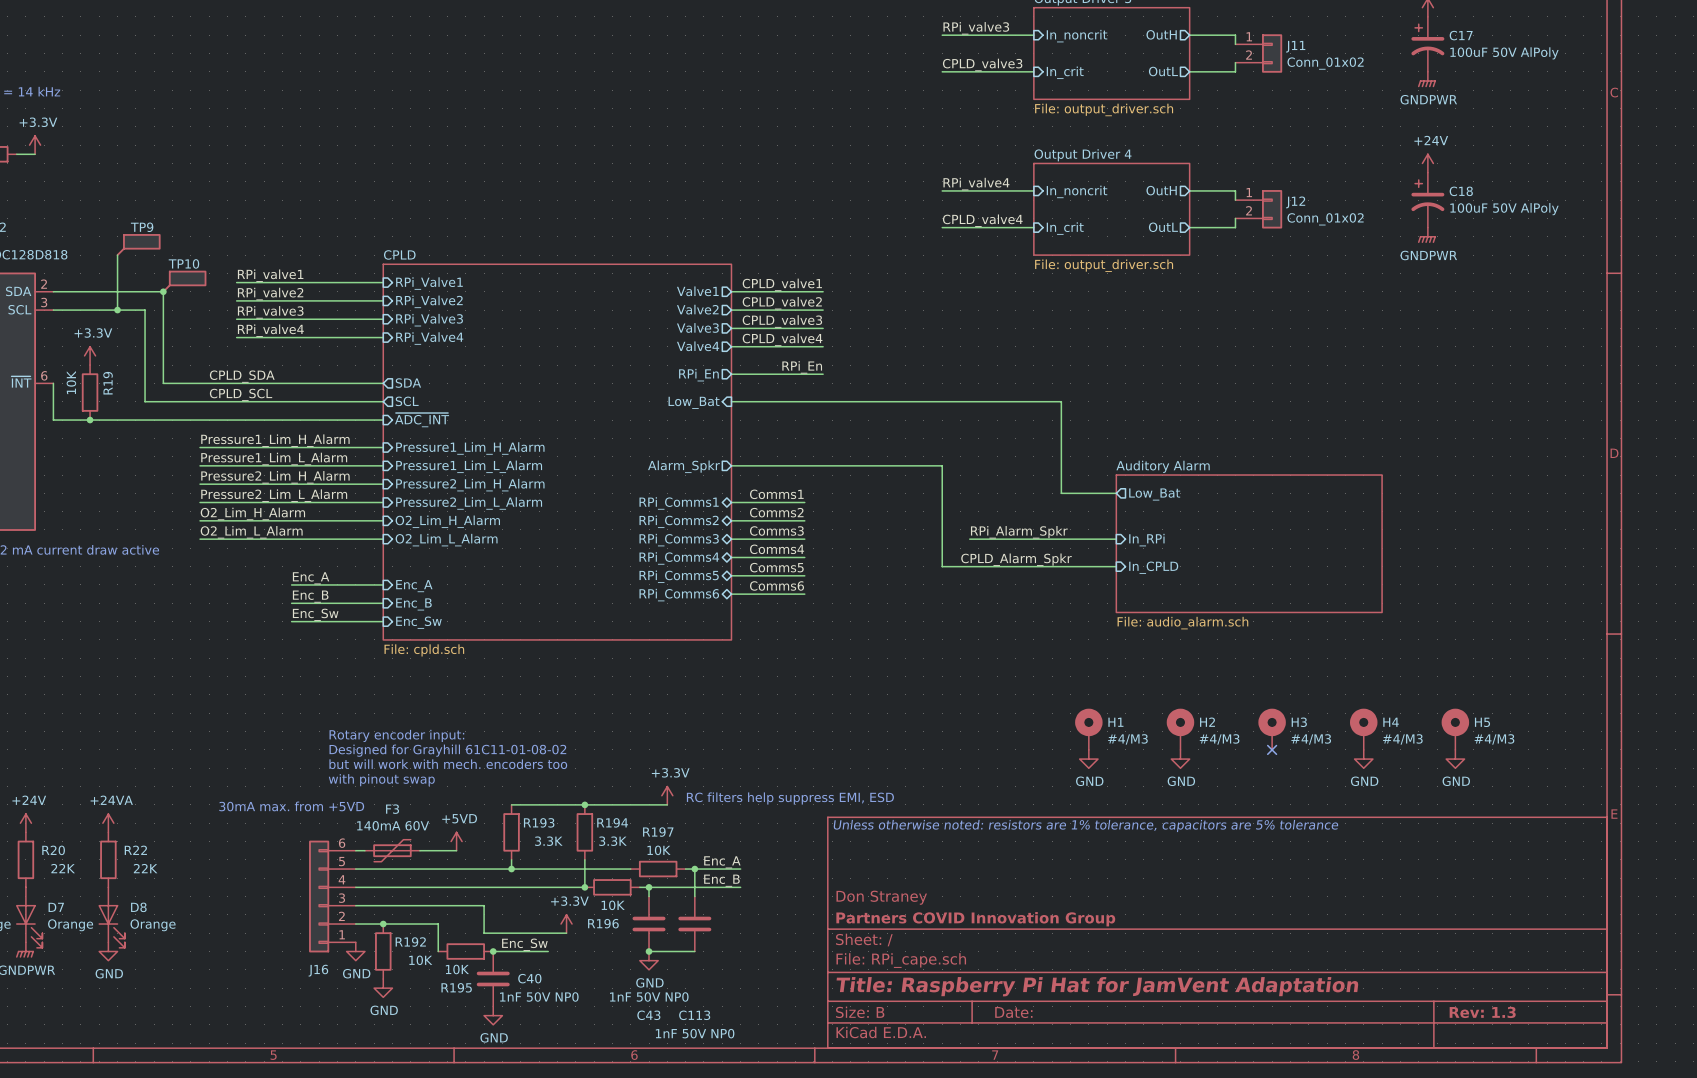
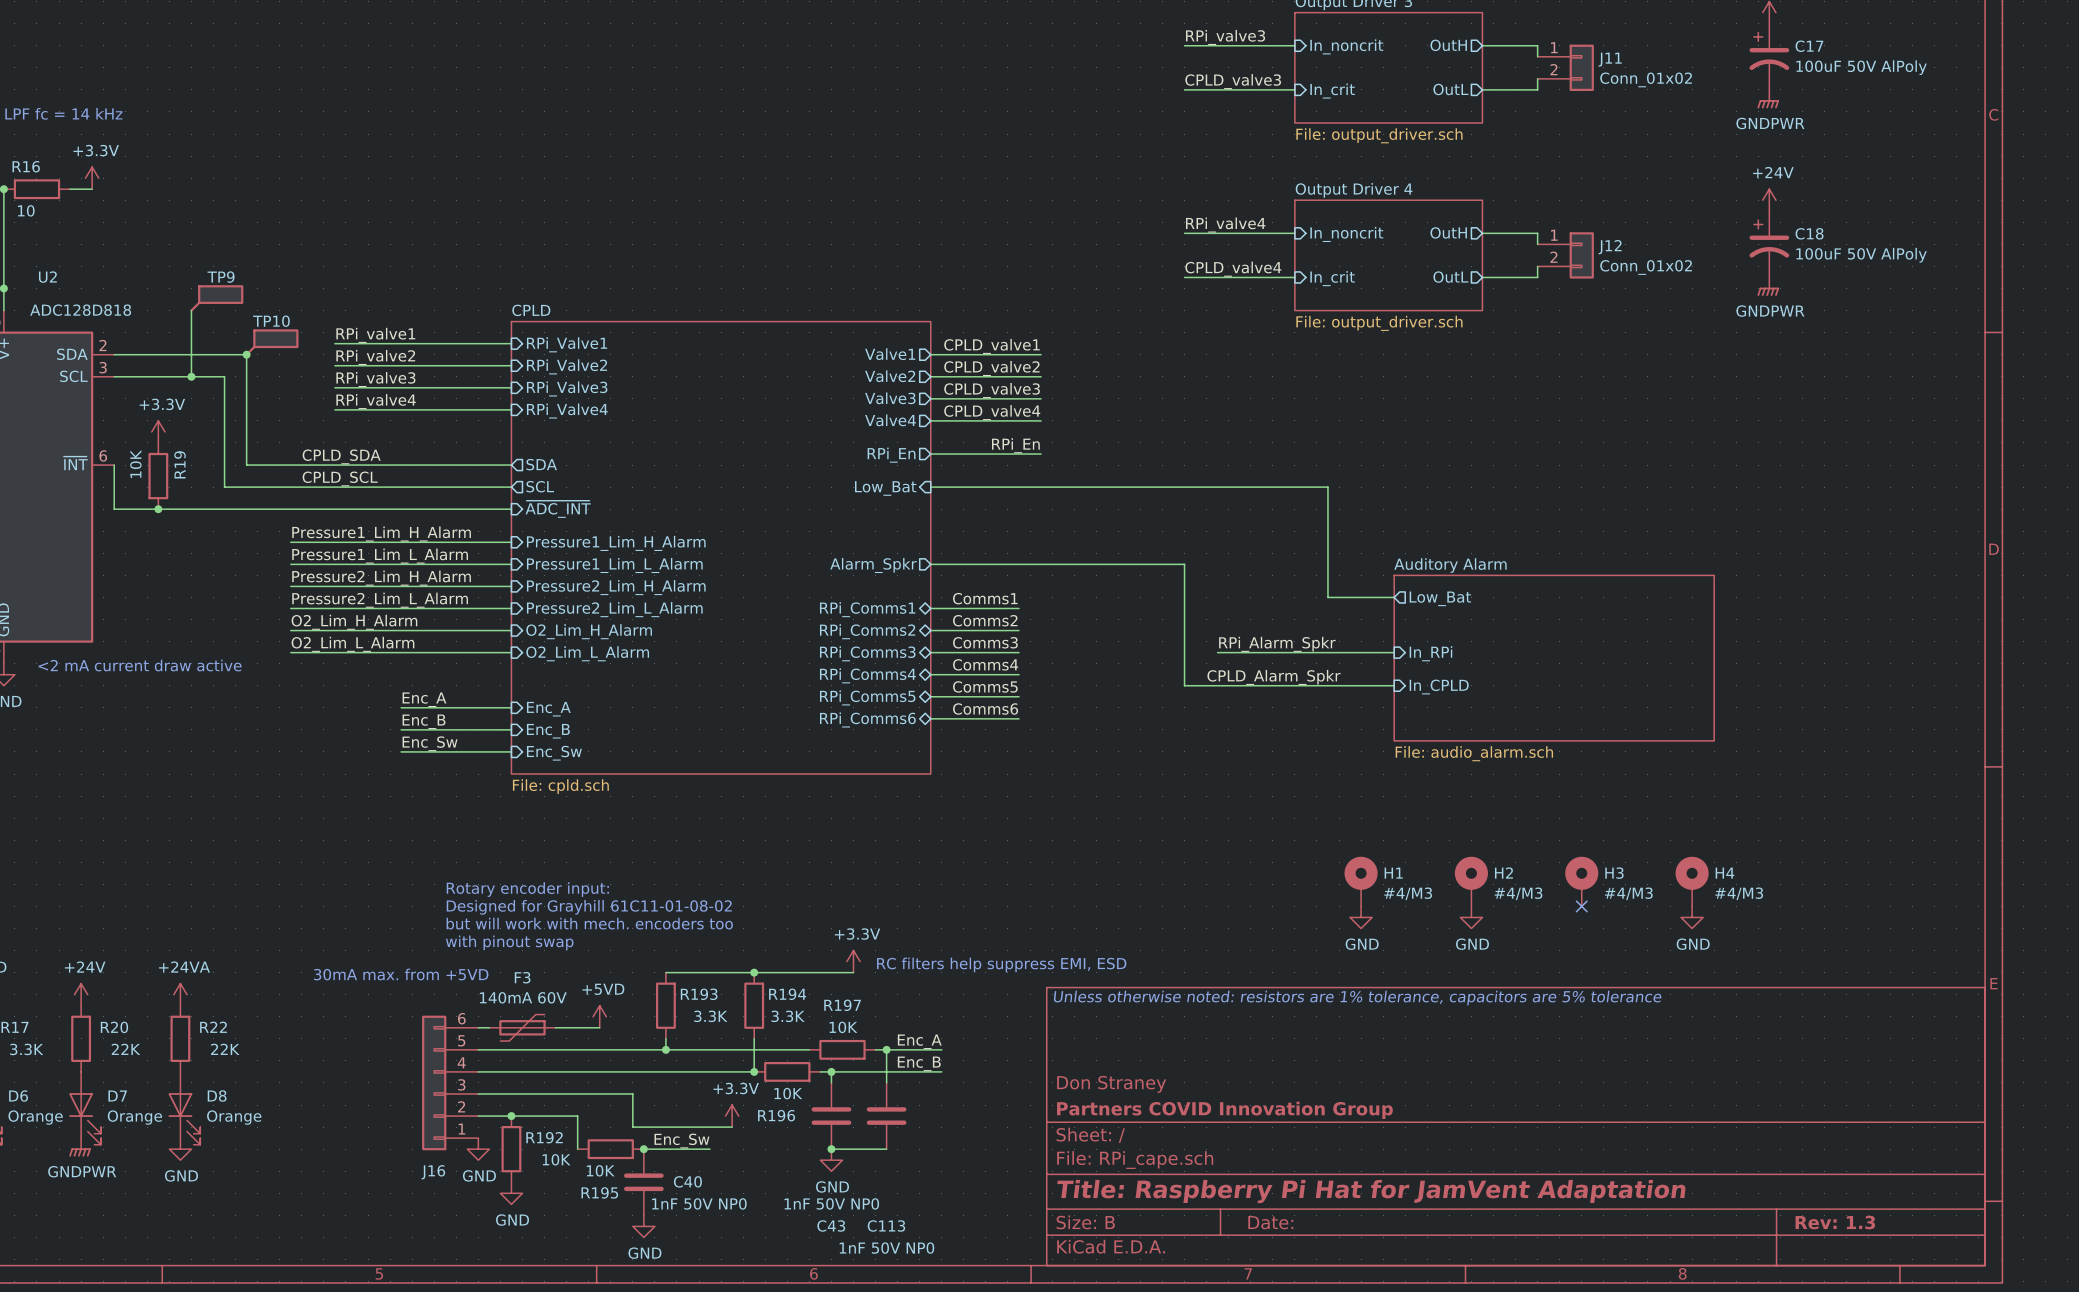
H5: #4/M3 (1455, 729) -> none
power symbol: GND (1455, 759) -> none

